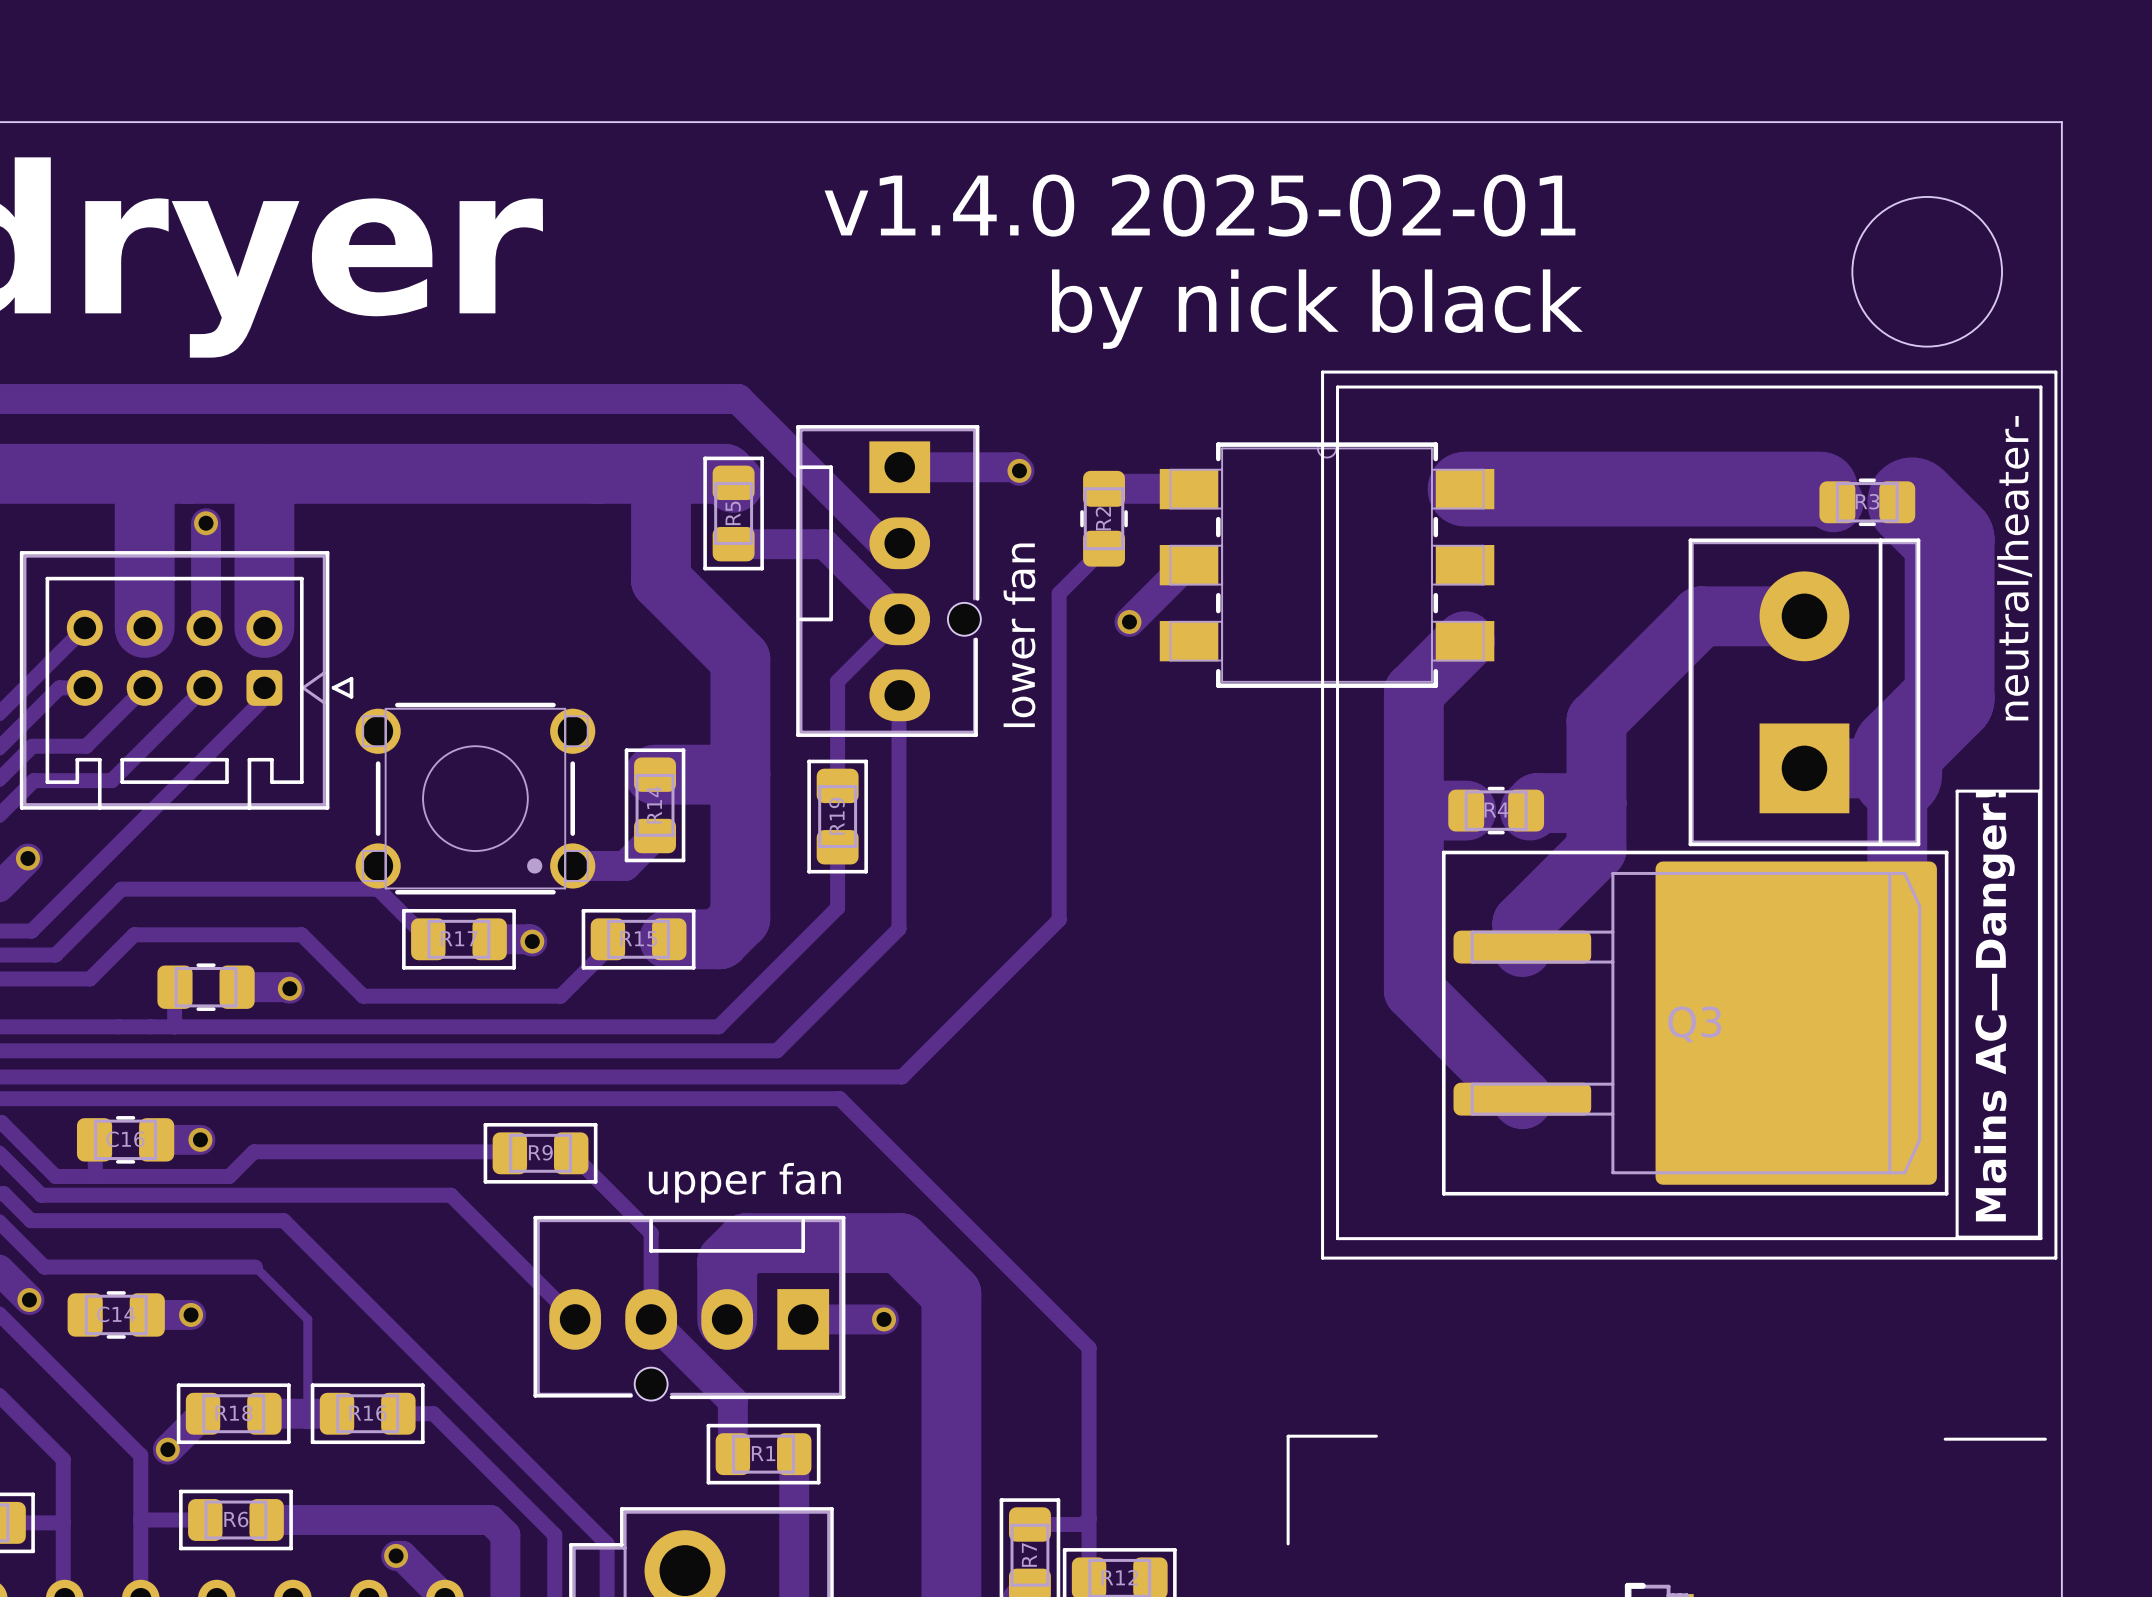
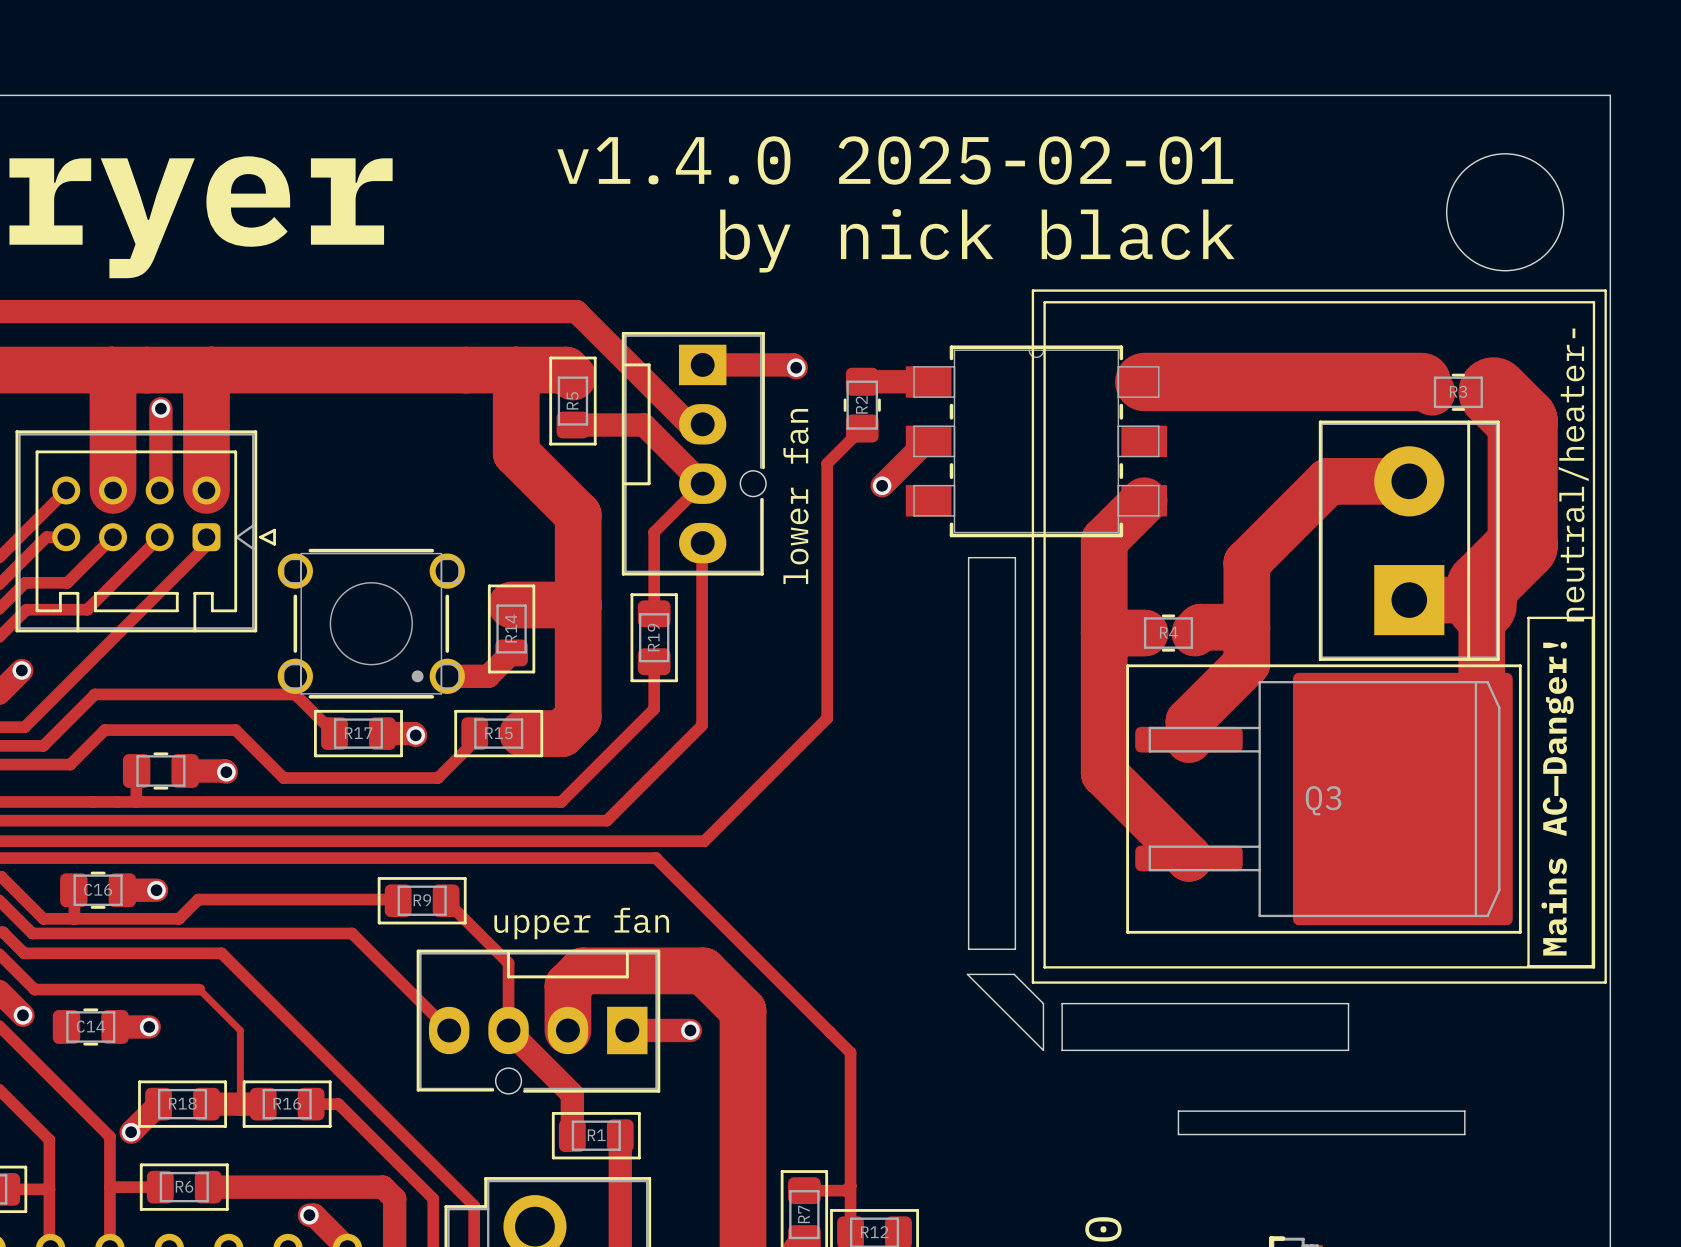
board edge: none -> (968, 557) (1015, 557) (1015, 949) (968, 949) (968, 557)
board edge: none -> (967, 974) (1043, 1050) (1043, 1003) (1014, 974) (967, 974)
board edge: none -> (1062, 1003) (1348, 1003) (1348, 1050) (1062, 1050) (1062, 1003)
board edge: none -> (1178, 1111) (1464, 1111) (1464, 1134) (1178, 1134) (1178, 1111)
line: (1376, 1436) (1288, 1436) (1288, 1543) -> none
line: (1945, 1439) (2045, 1439) -> none

